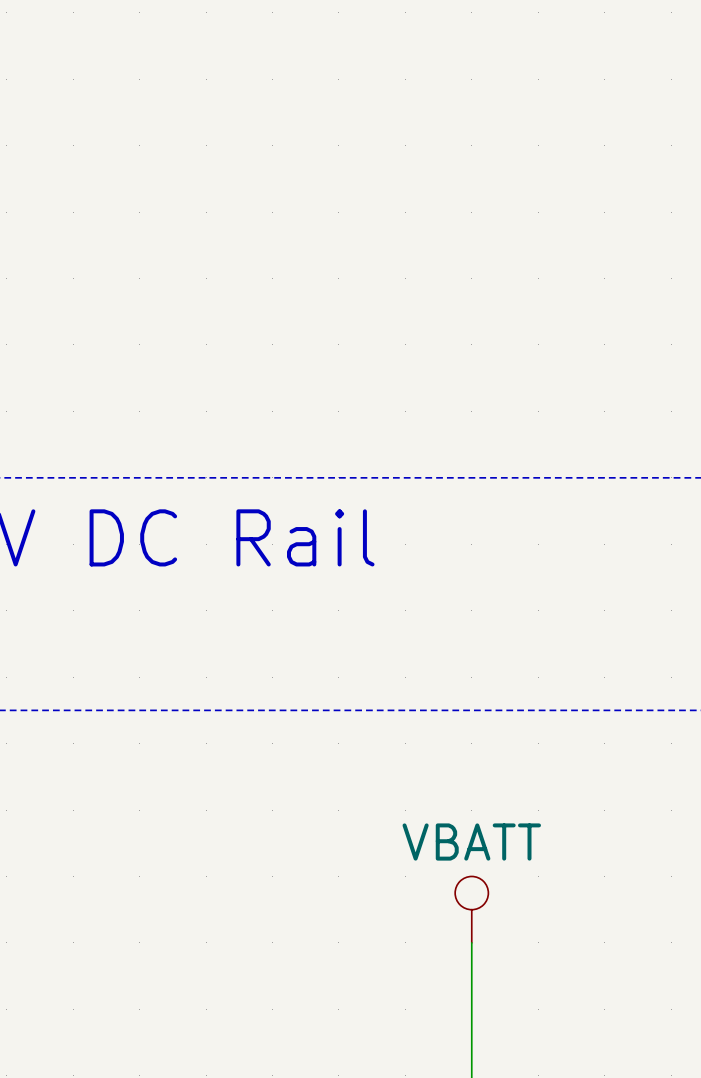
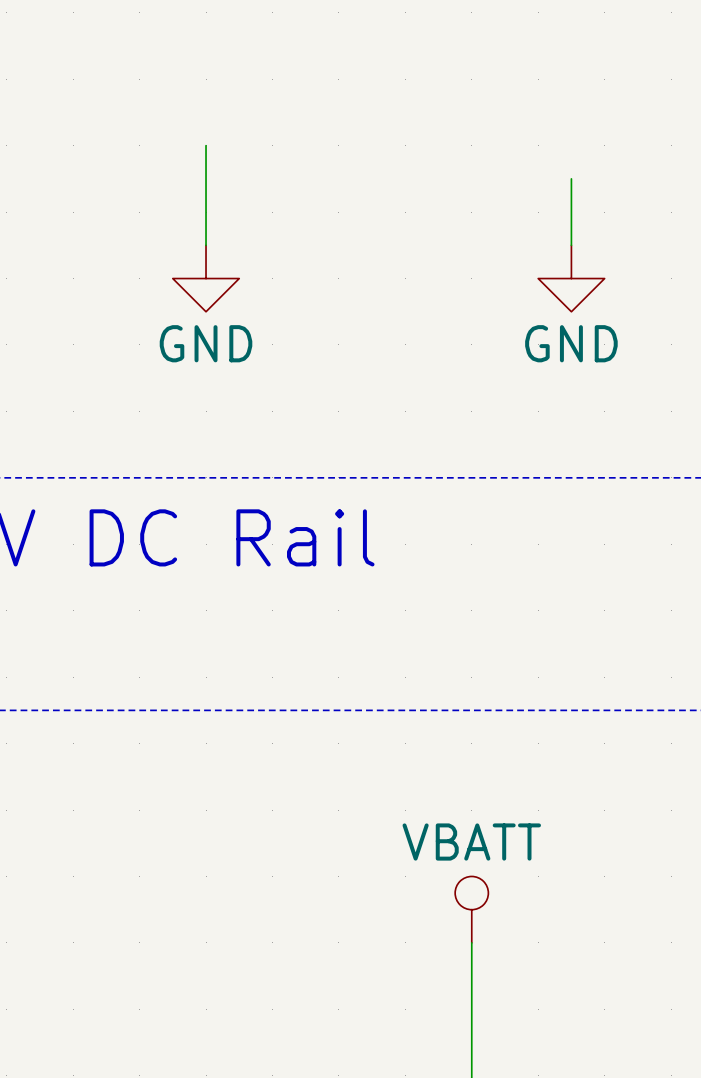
wire: none -> (206, 145) (206, 245)
wire: none -> (571, 178) (571, 245)
power symbol: none -> GND (206, 278)
power symbol: none -> GND (571, 278)

